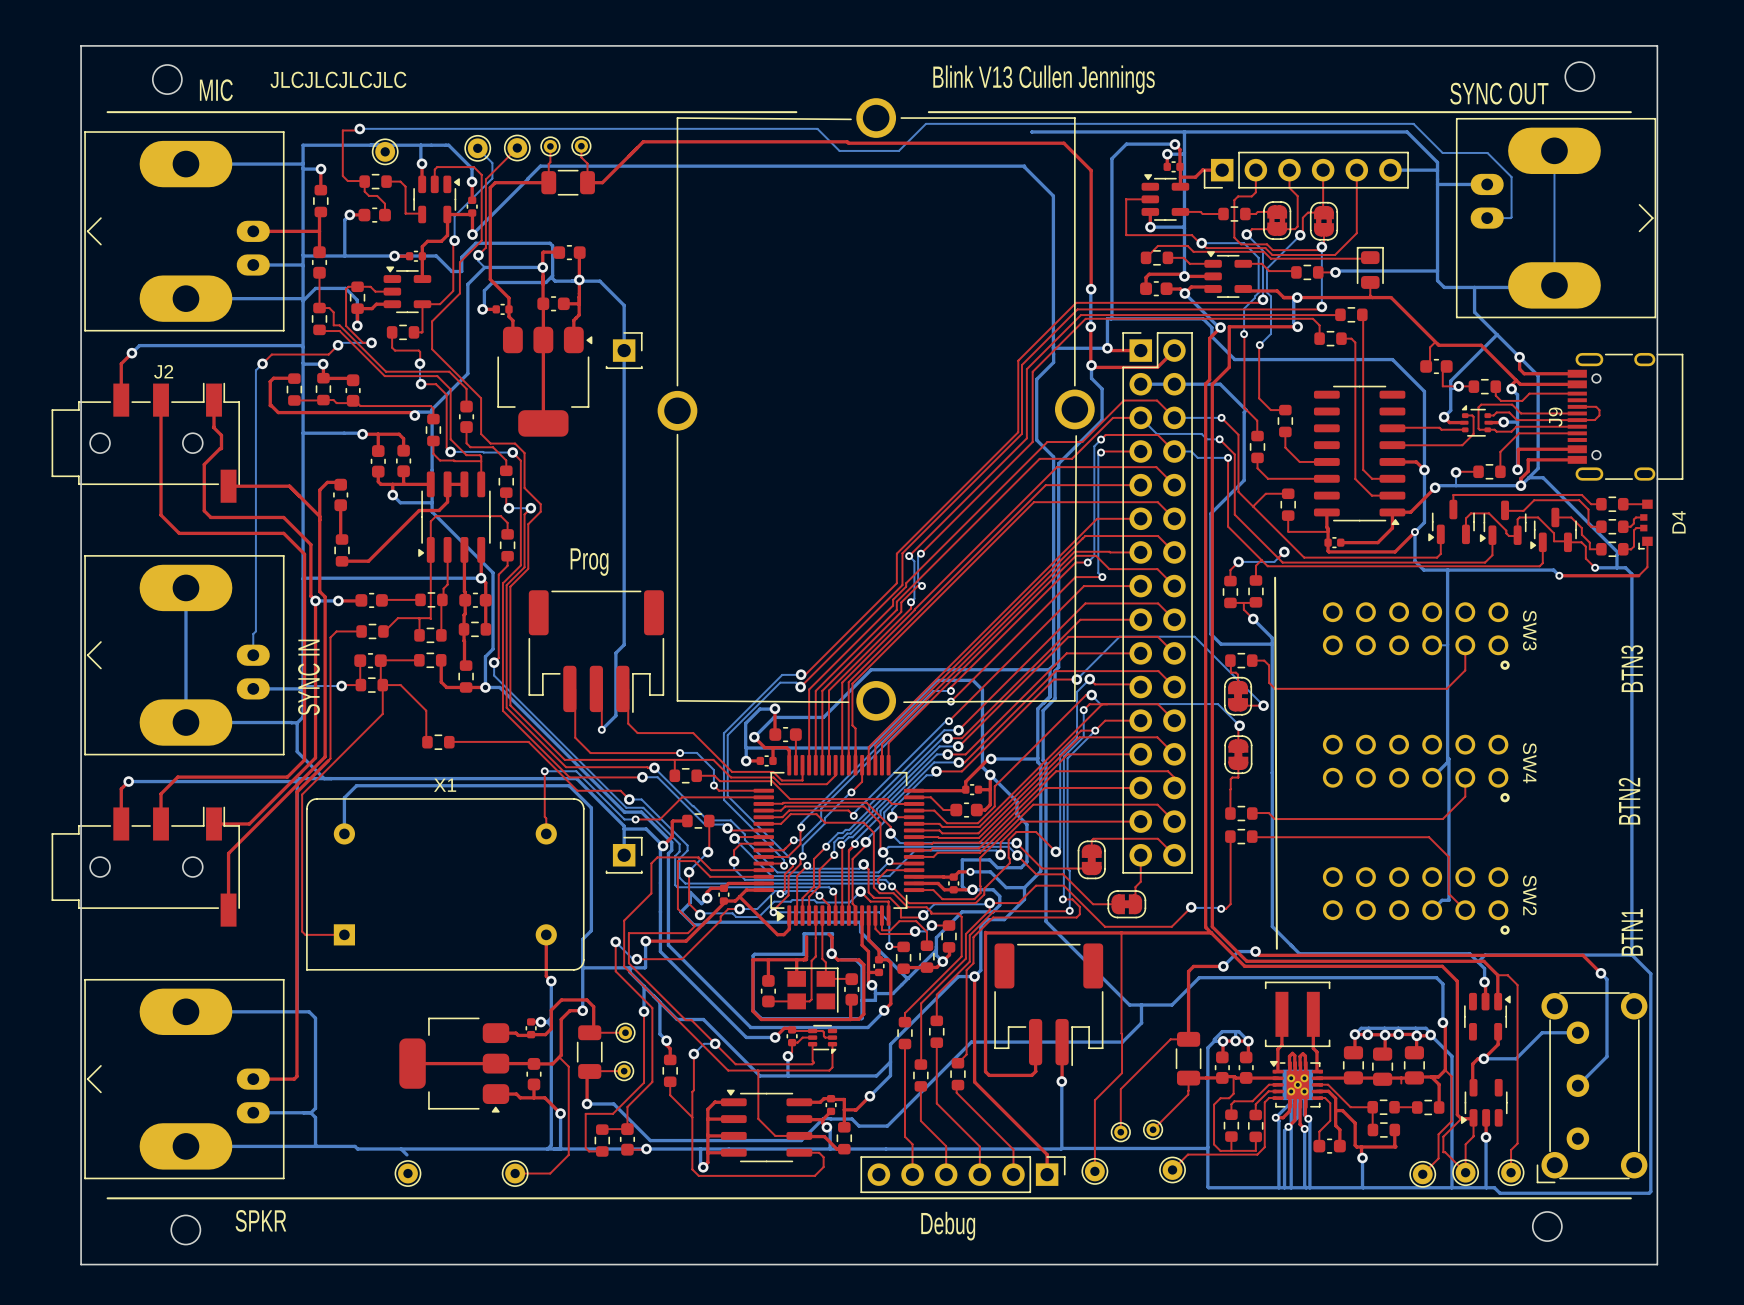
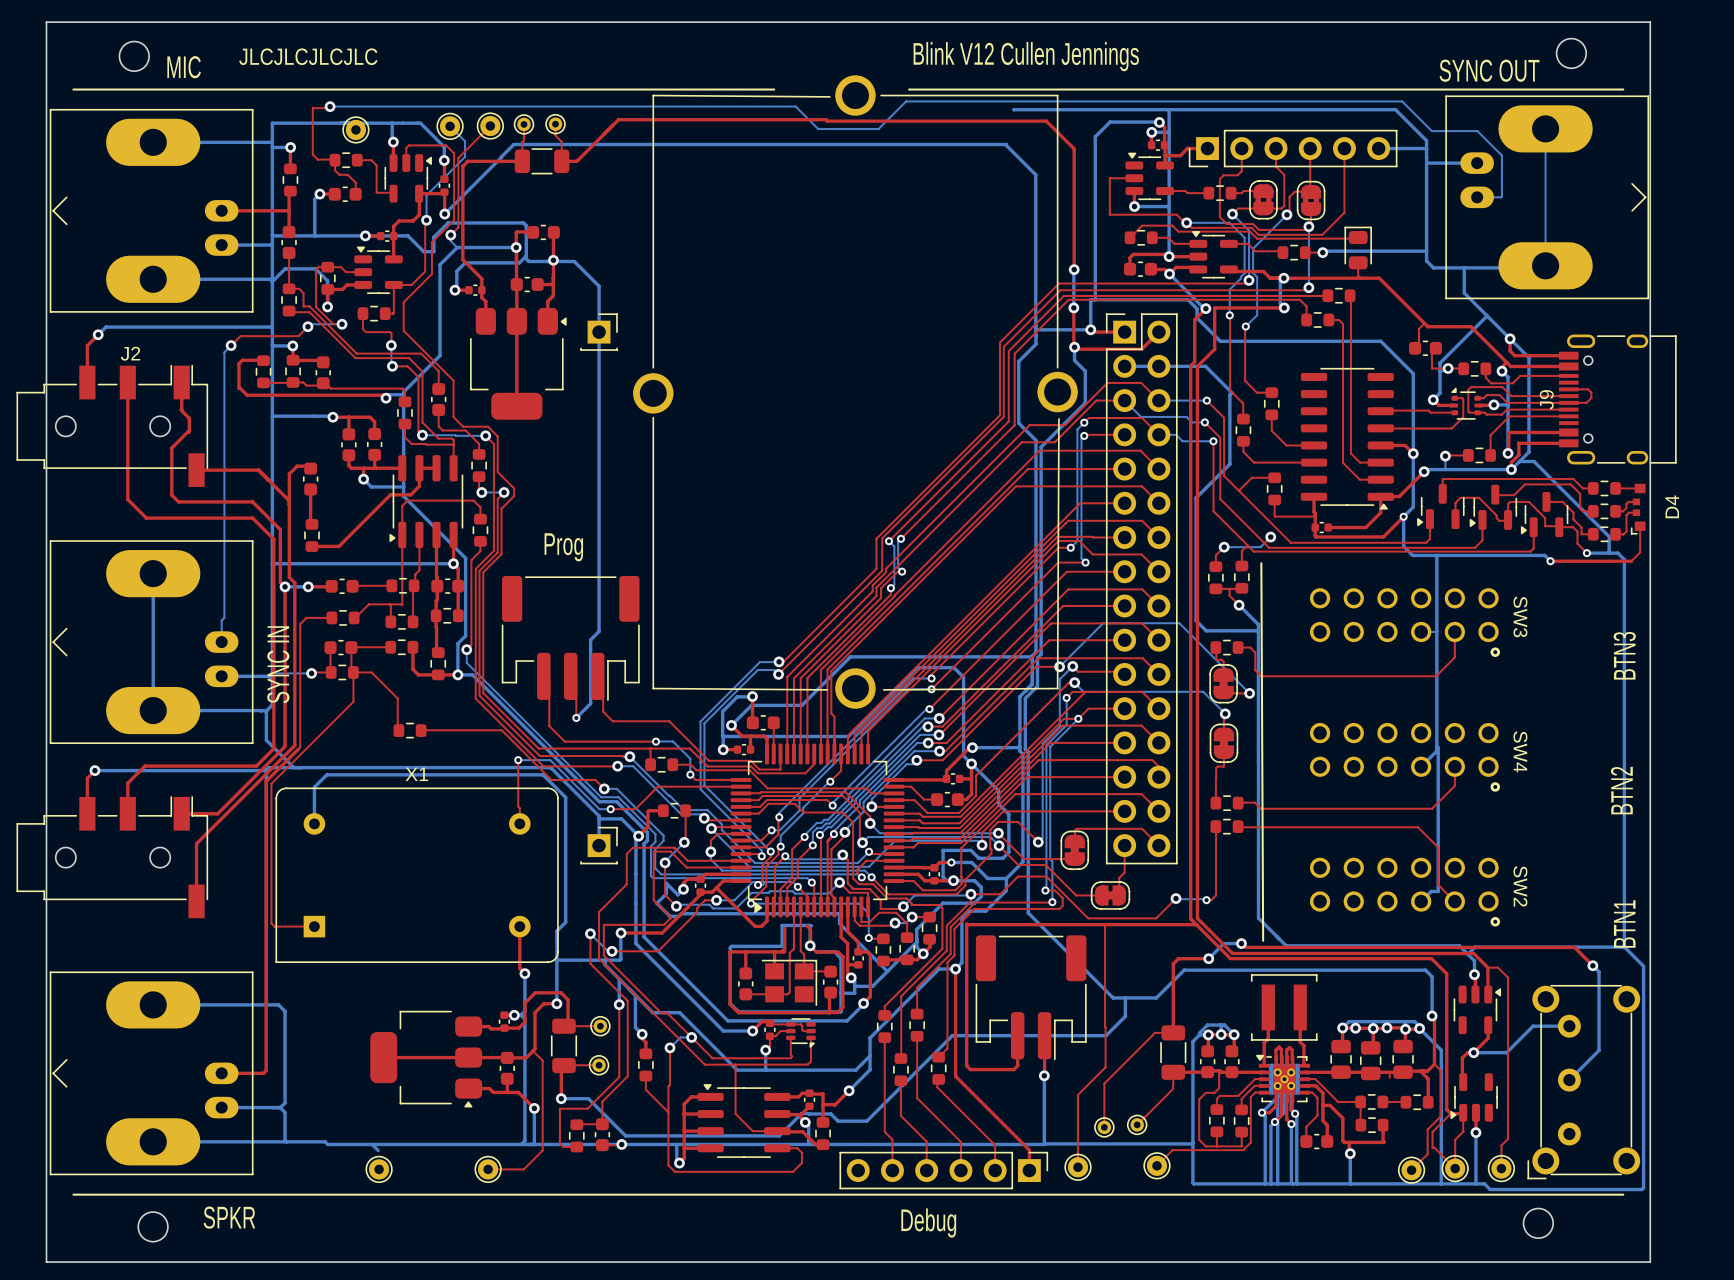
text: Blink V13 Cullen Jennings (1044, 79) -> Blink V12 Cullen Jennings (1026, 56)

